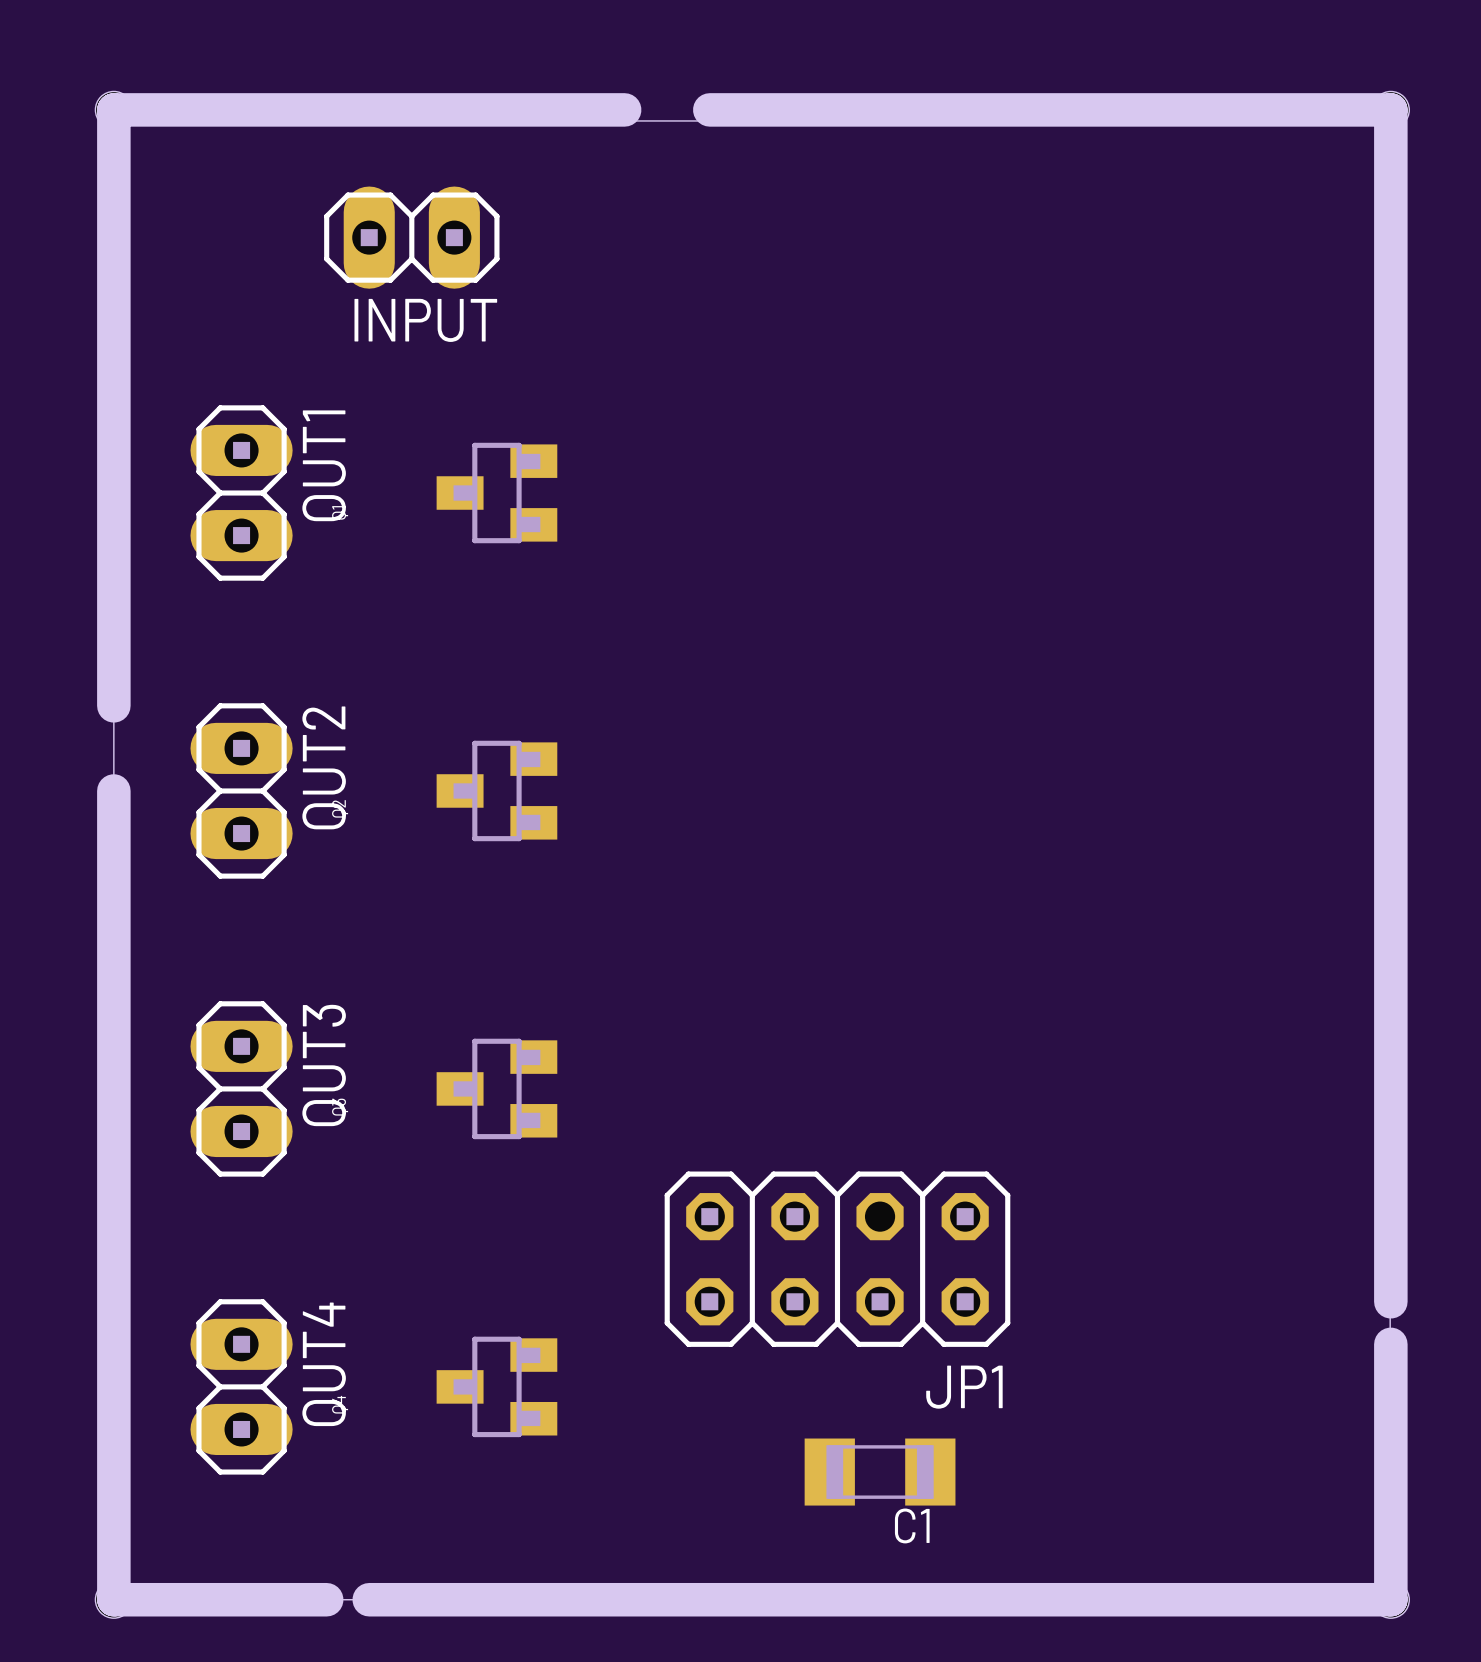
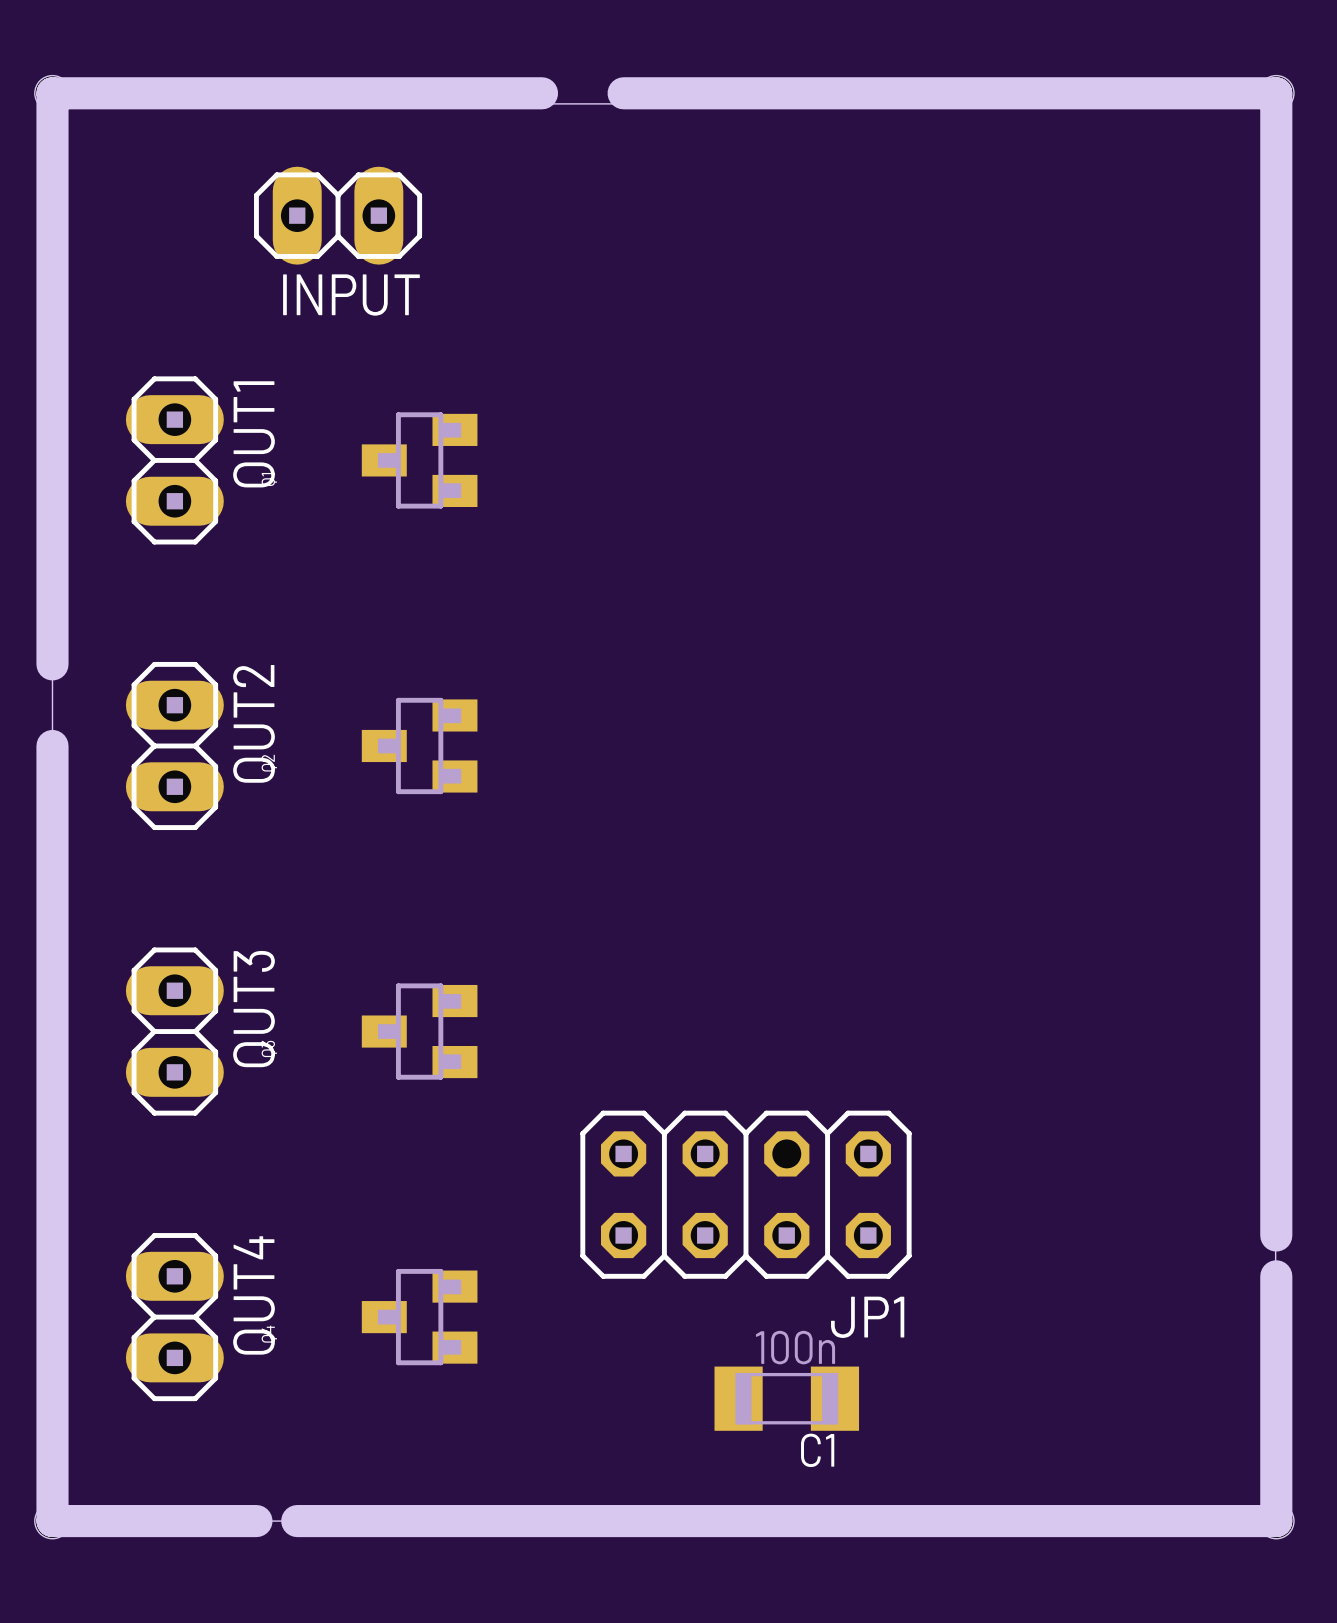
C1 value: none -> 100n (795, 1347)

